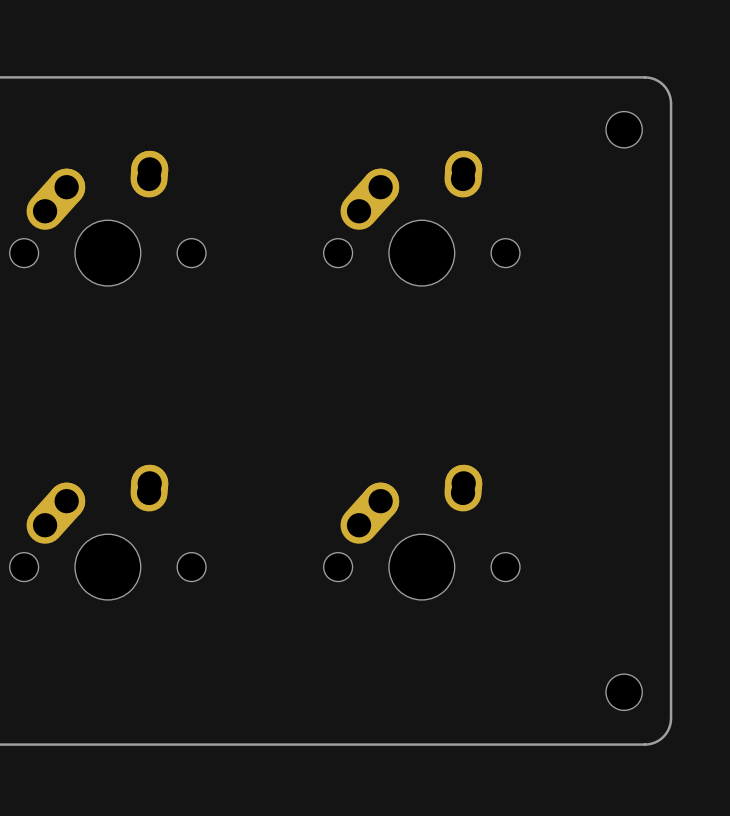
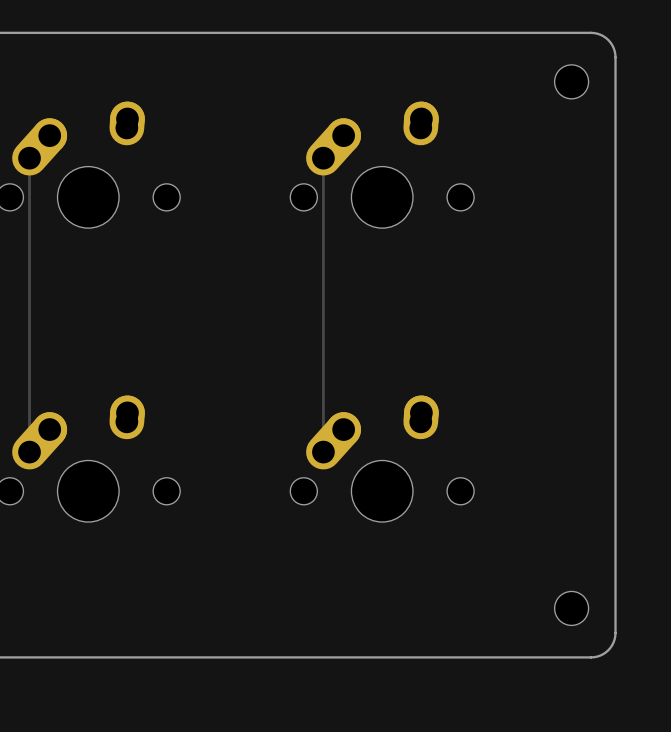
track: none -> (29, 158) (29, 452)
track: none -> (323, 158) (323, 452)

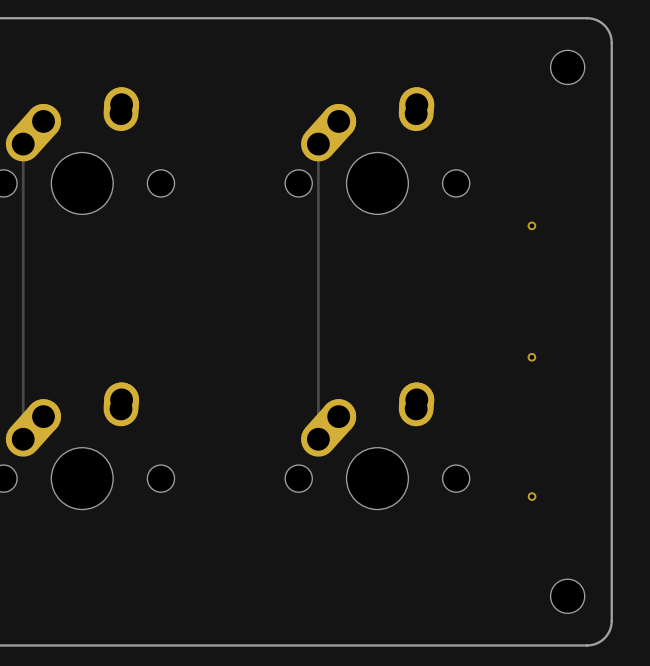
via: none -> (531, 225)
via: none -> (531, 357)
via: none -> (532, 496)

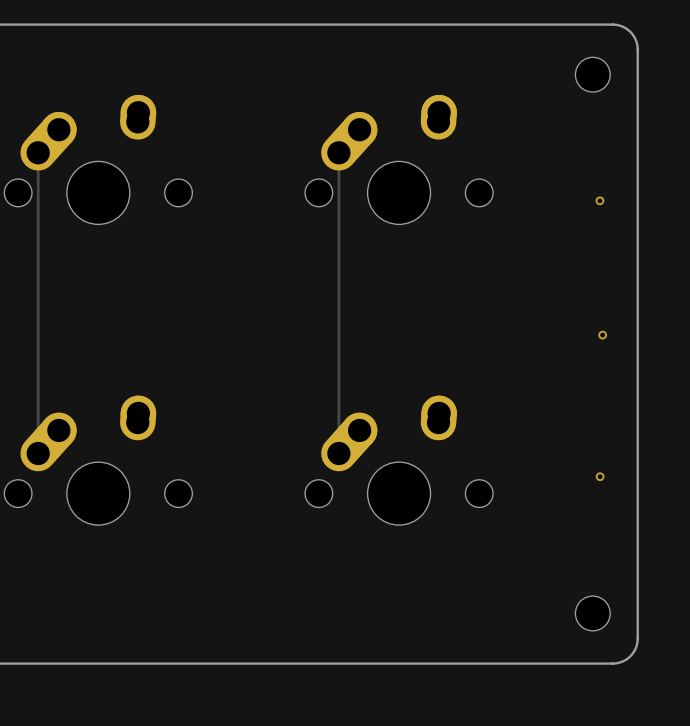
via: none -> (599, 200)
via: (531, 225) -> none
via: none -> (602, 335)
via: (531, 357) -> none
via position: (532, 496) -> (600, 476)

